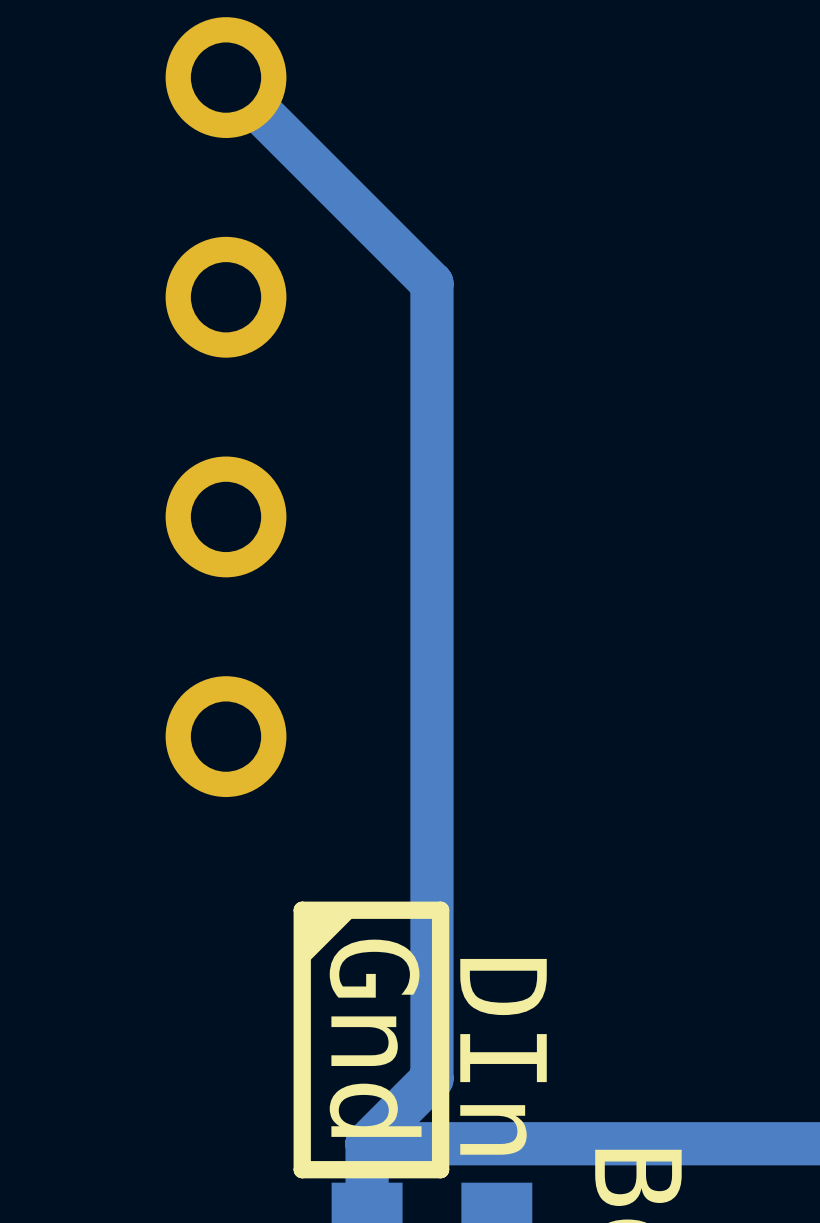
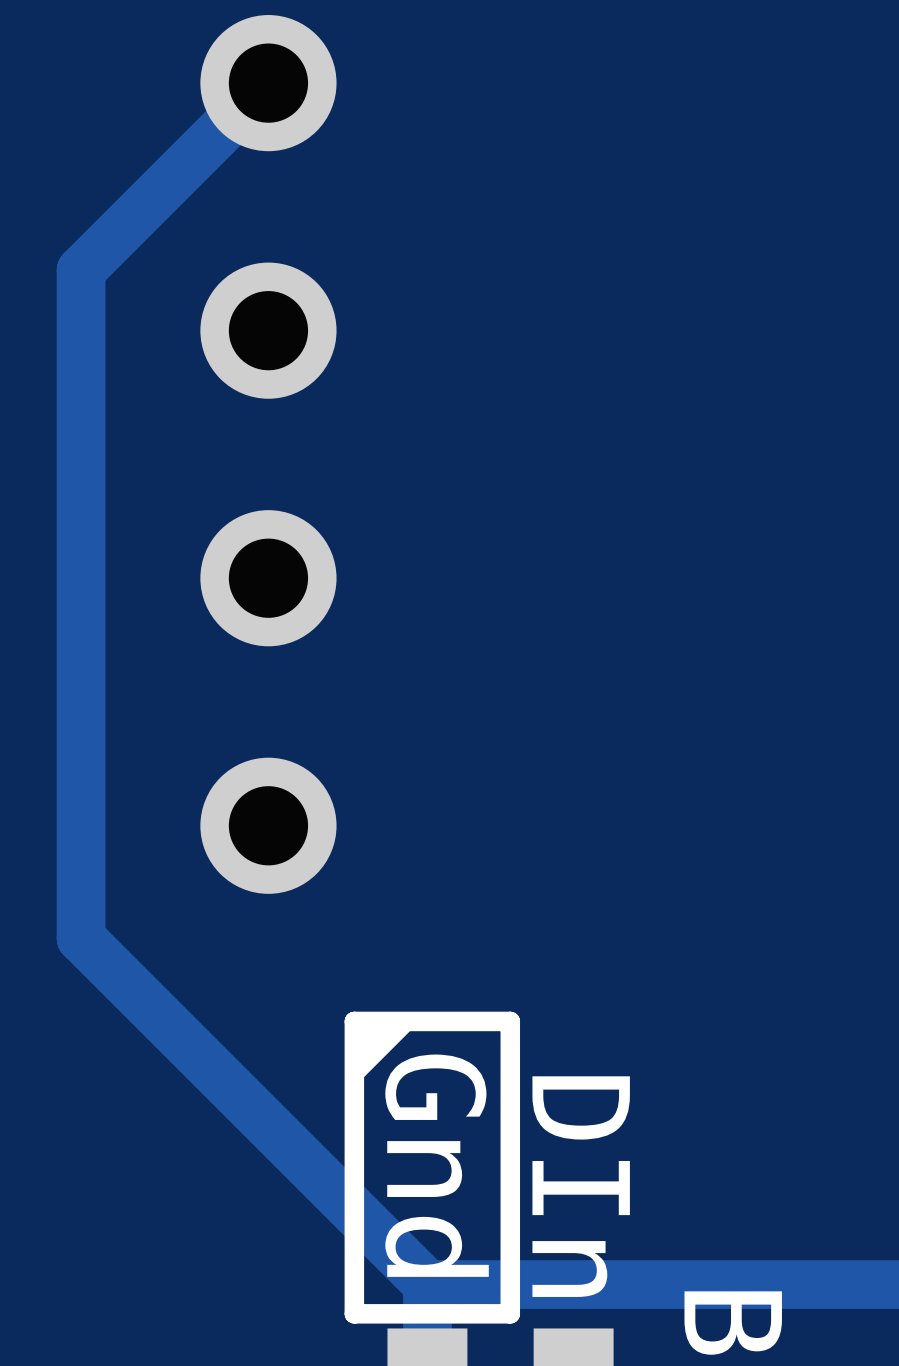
track: (226, 77) (431, 283) (431, 1078) (367, 1143) -> (268, 83) (81, 270) (81, 938) (427, 1284)

